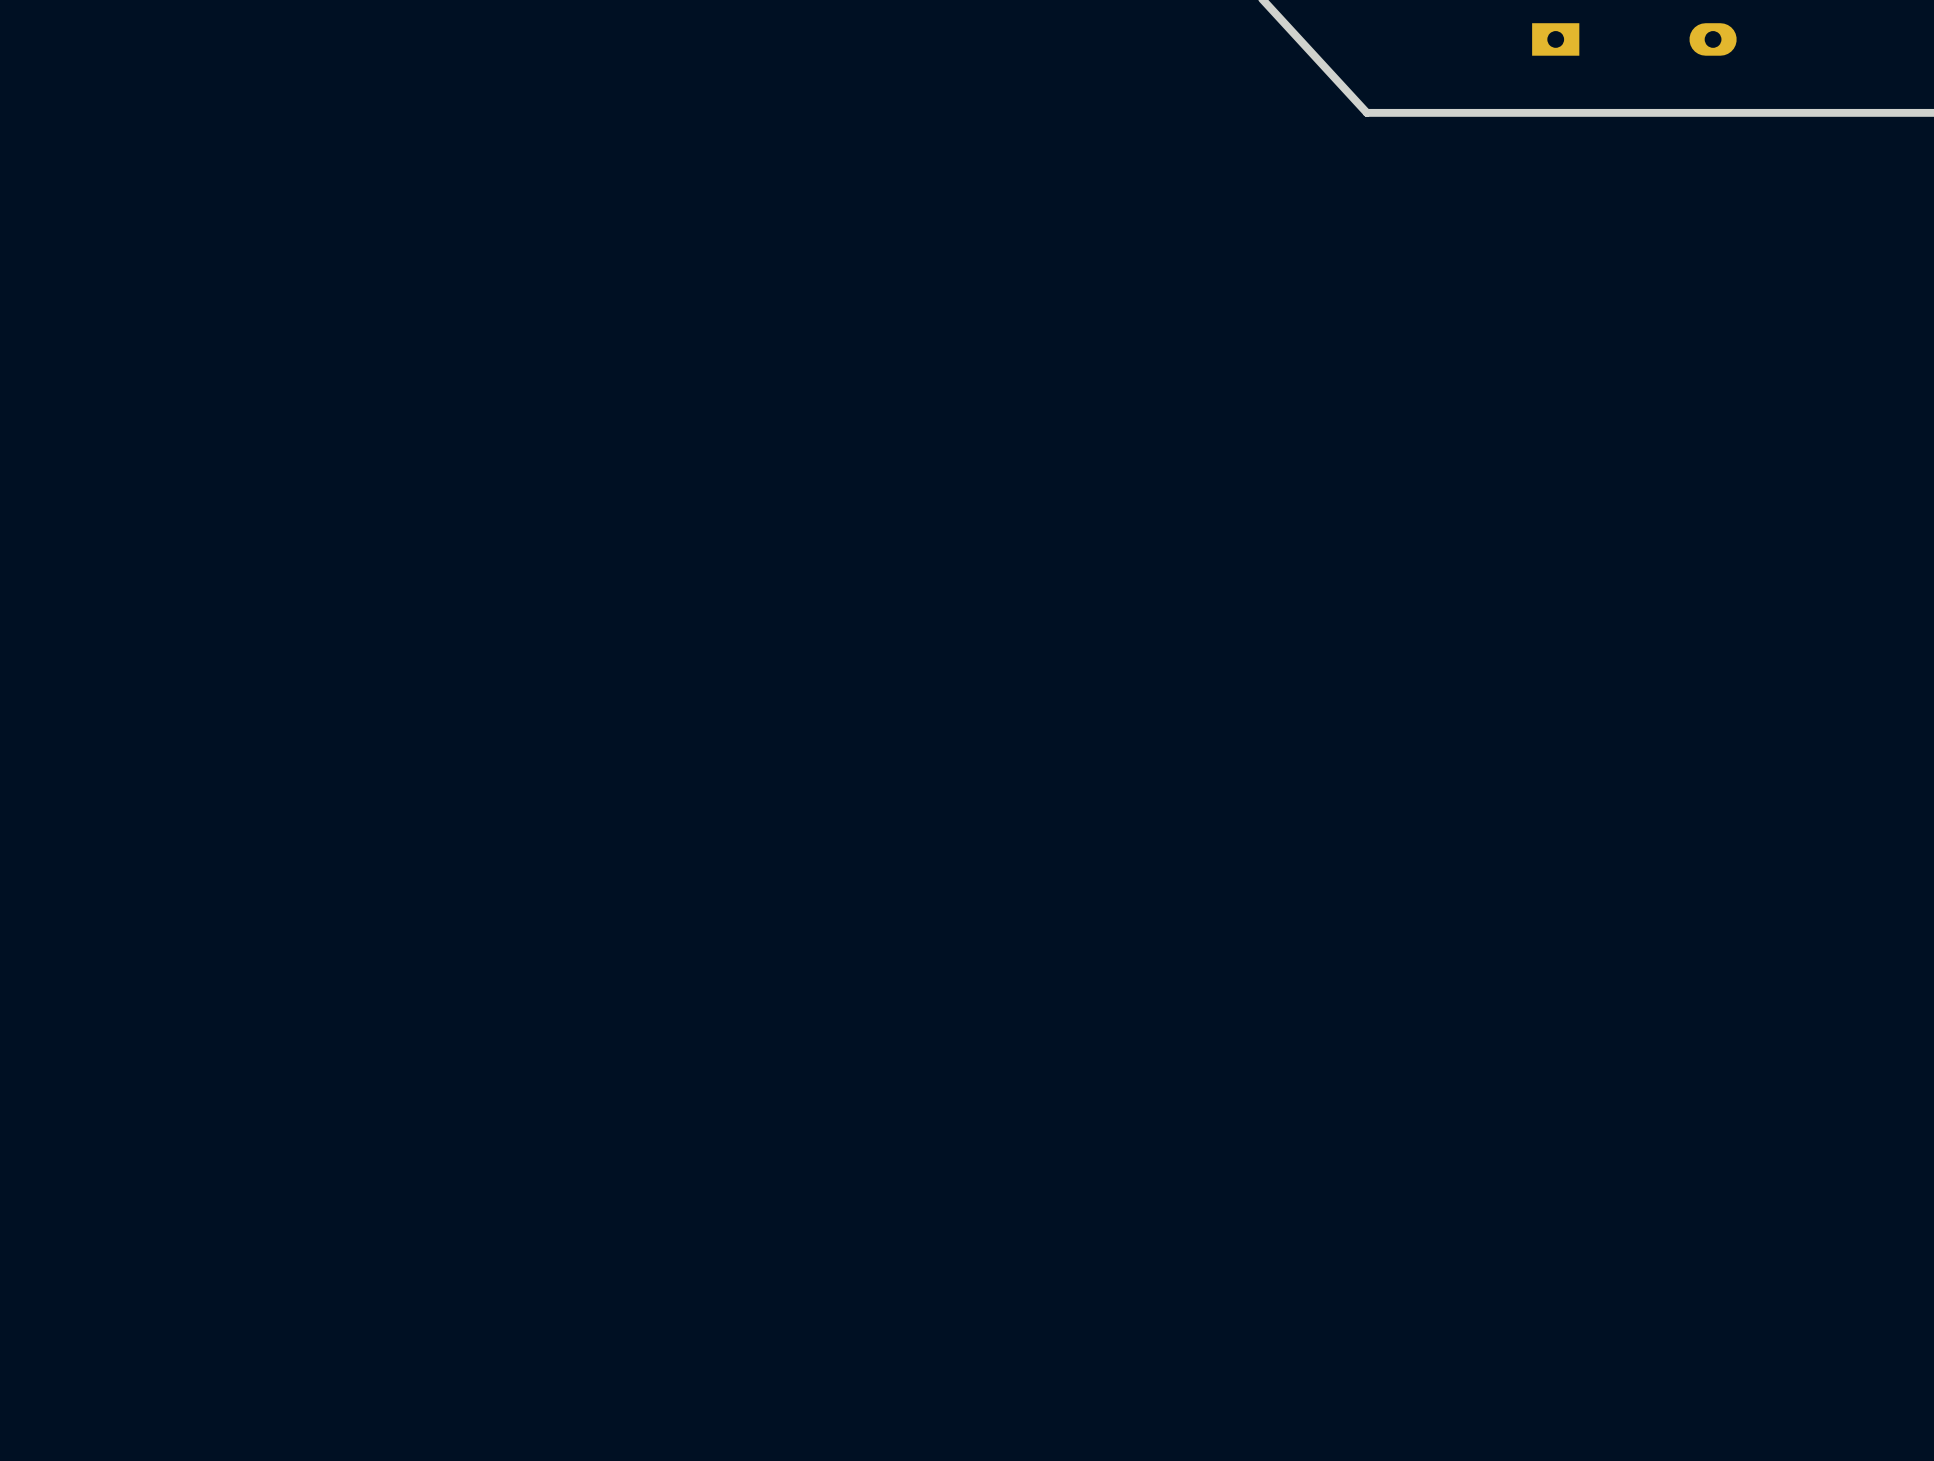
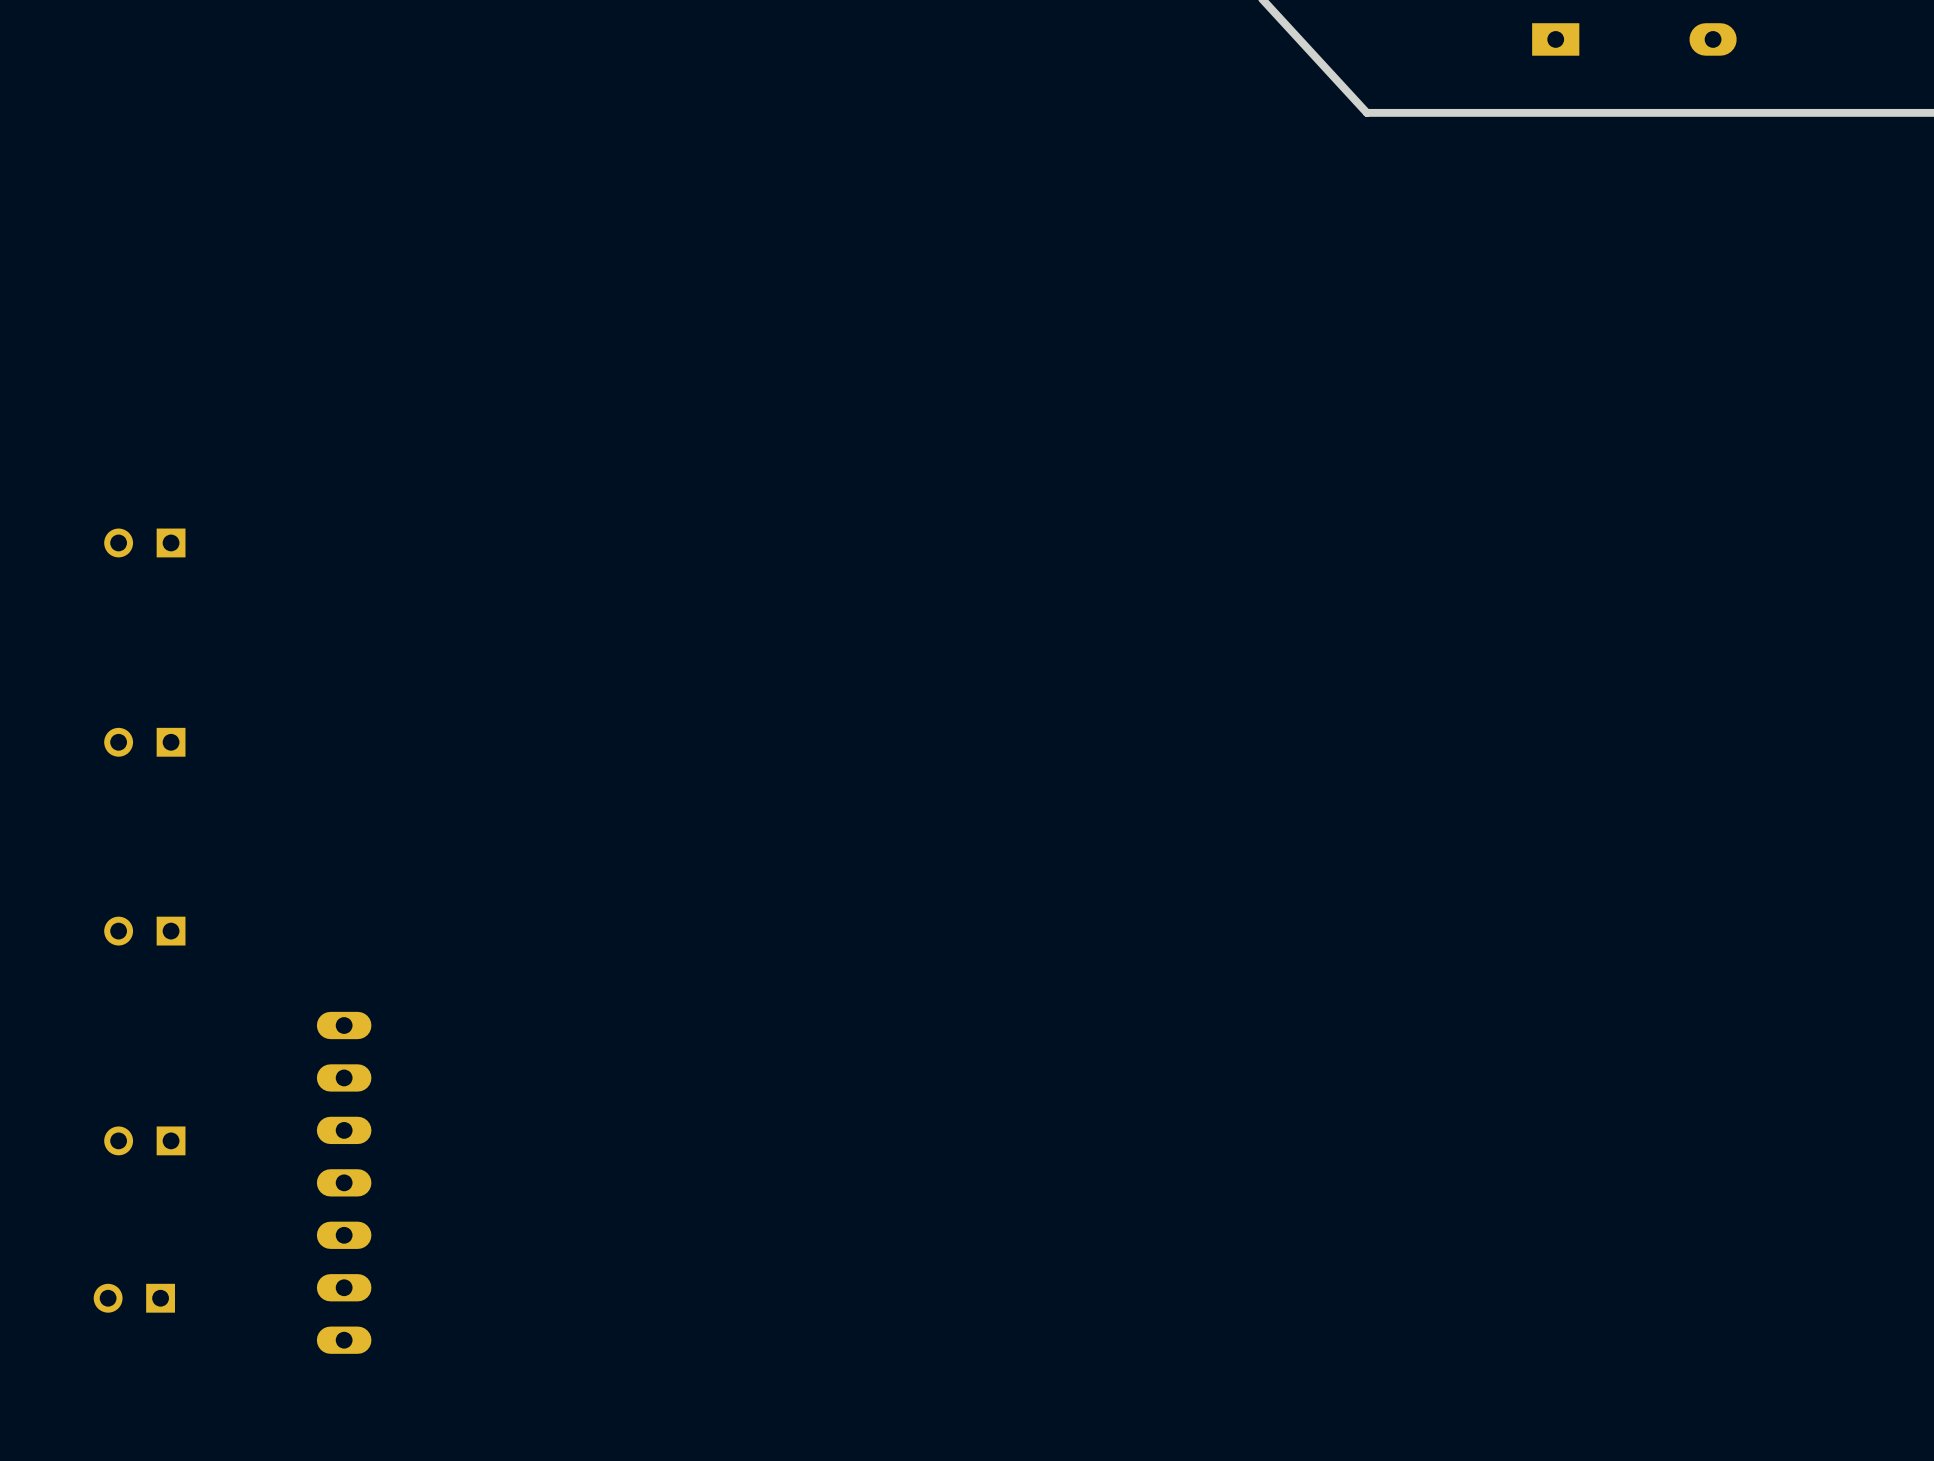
part: none -> (144, 542)
part: none -> (144, 742)
part: none -> (144, 931)
part: none -> (144, 1140)
part: none -> (344, 1182)
part: none -> (134, 1298)

